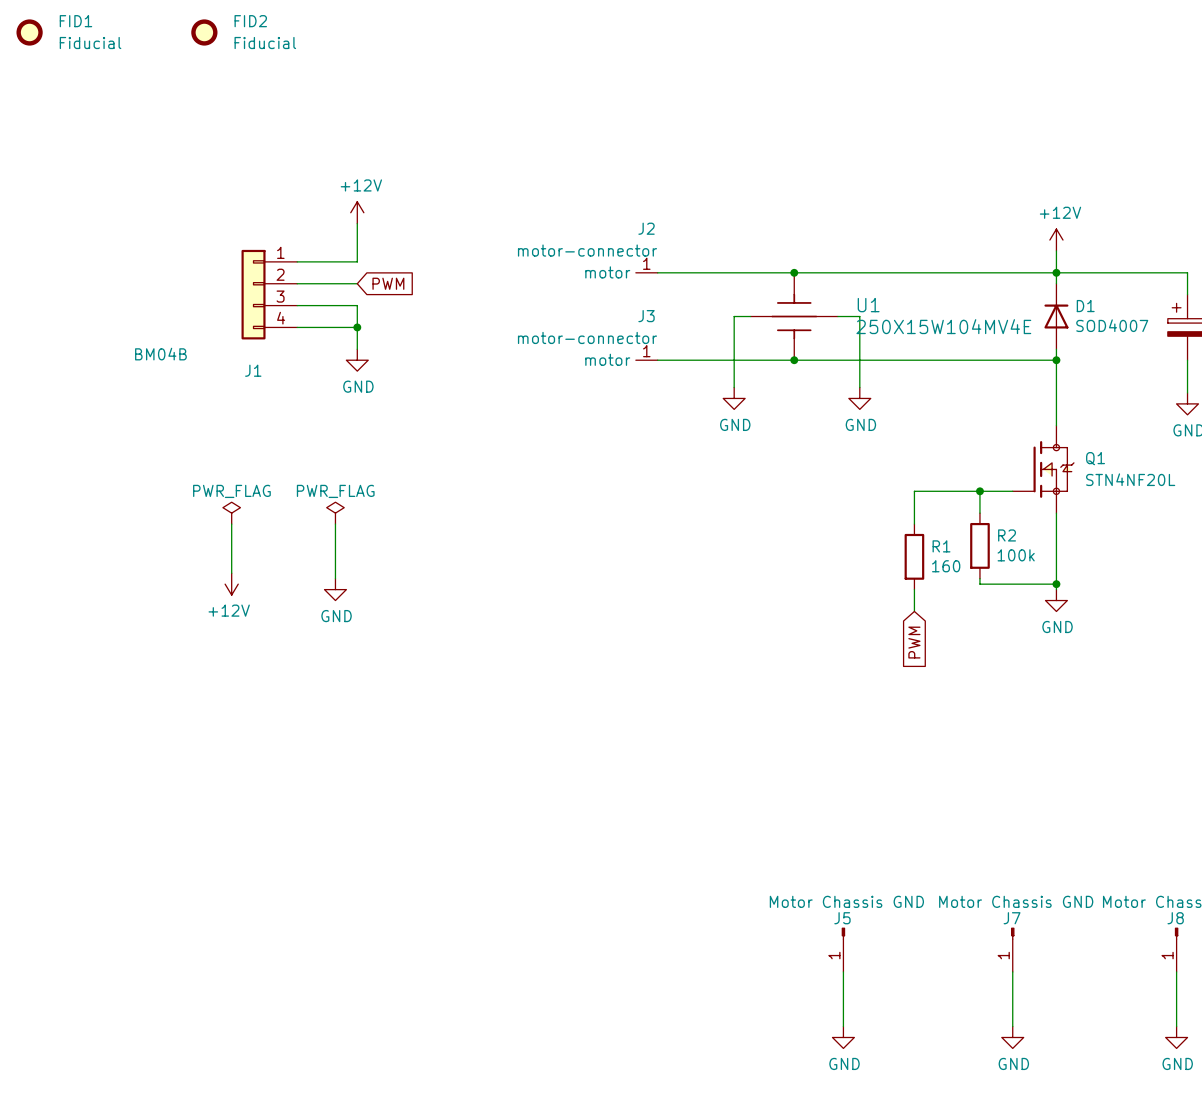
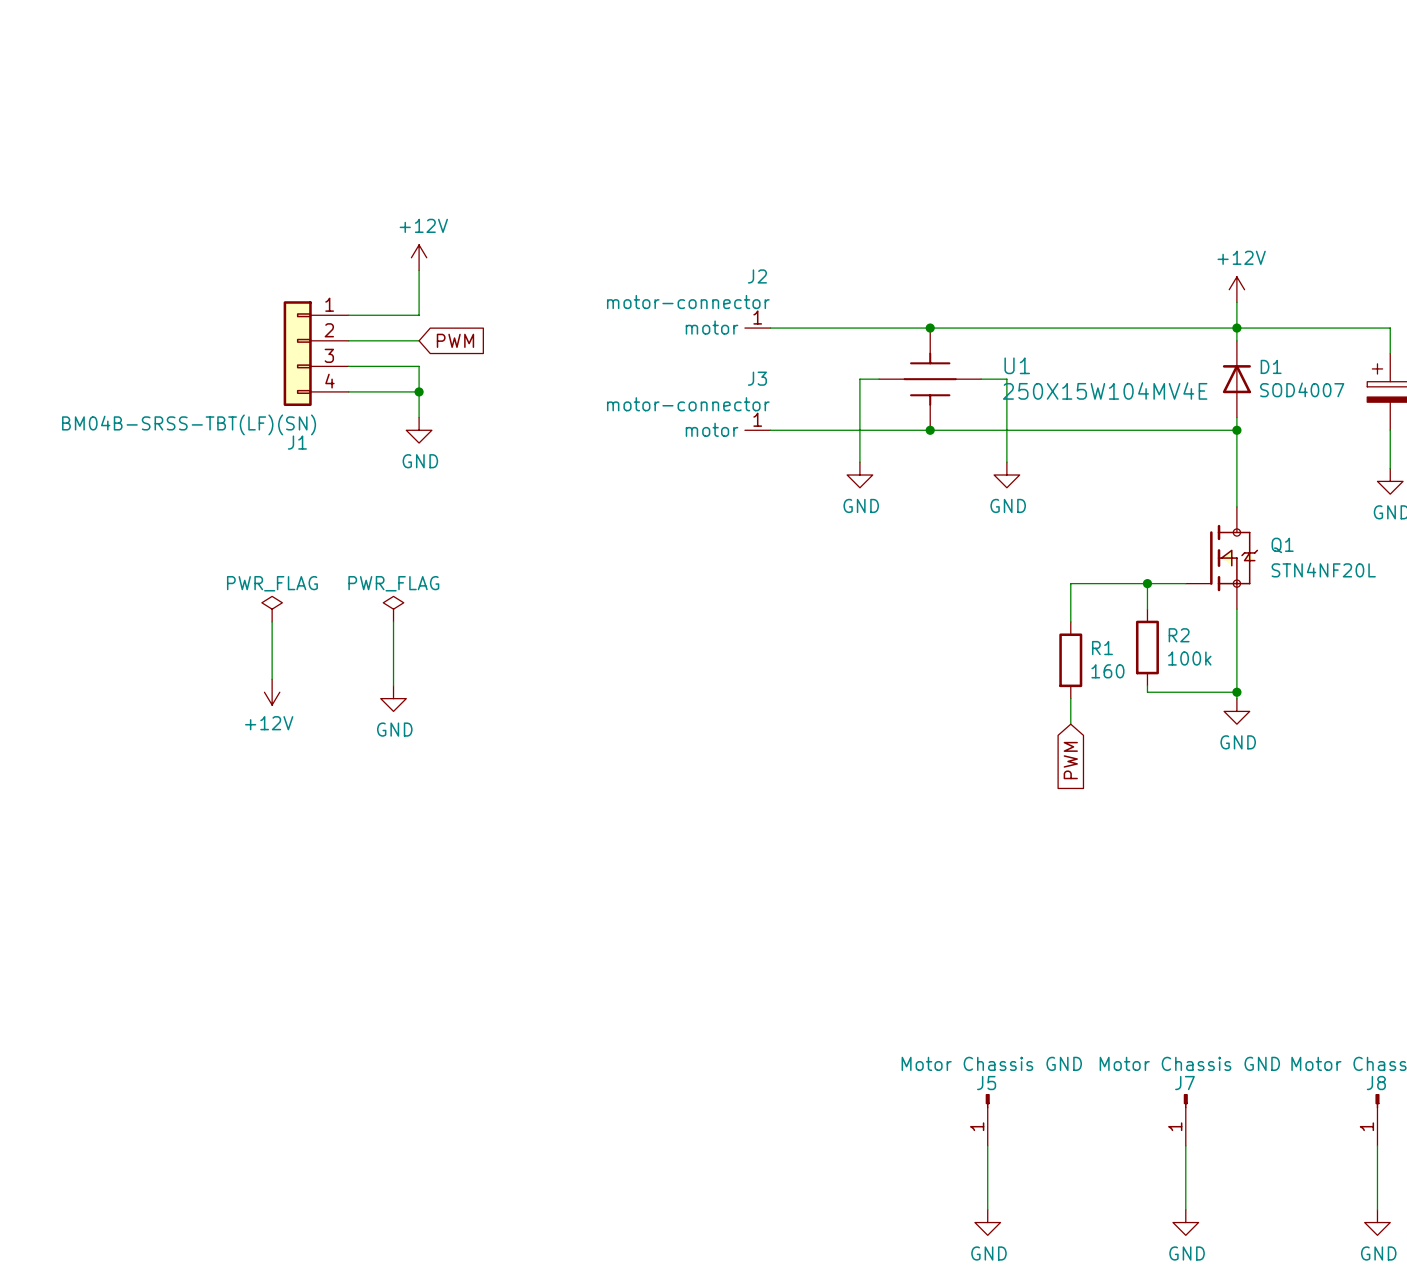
FID1: Fiducial (29, 32) -> none
FID2: Fiducial (204, 32) -> none
J1 value: BM04B (160, 354) -> BM04B-SRSS-TBT(LF)(SN) (189, 424)

